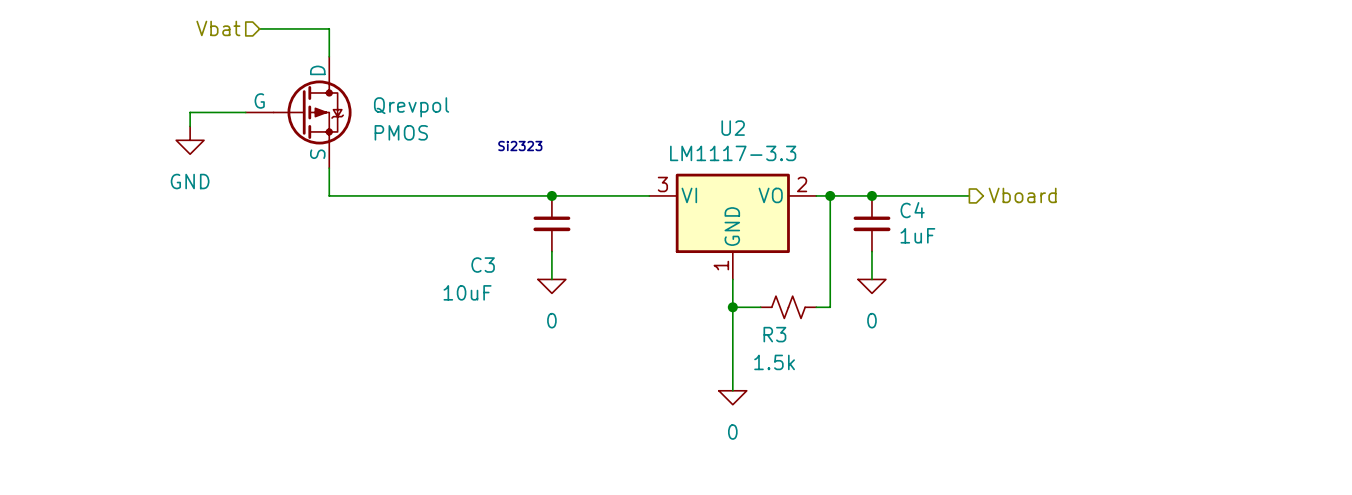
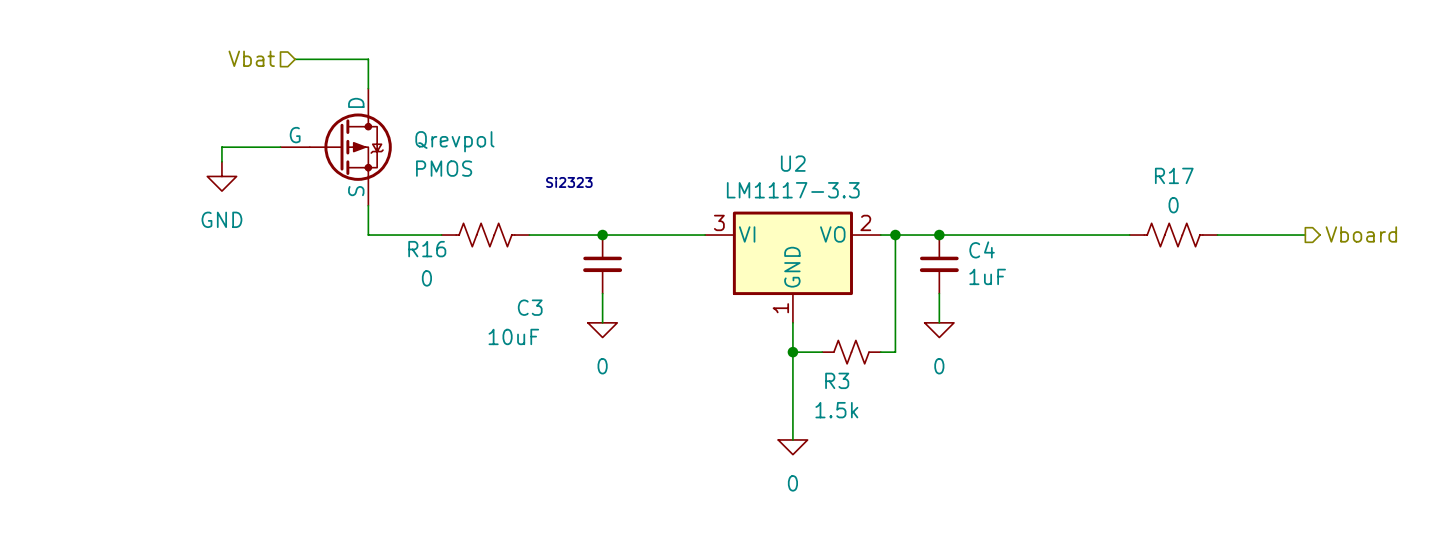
R16: none -> 0 (485, 235)
wire: none -> (1041, 235) (1129, 235)
hierarchical label position: Vboard (1022, 195) -> Vboard (1361, 234)
R17: none -> 0 (1173, 235)
wire: none -> (1217, 235) (1305, 235)

